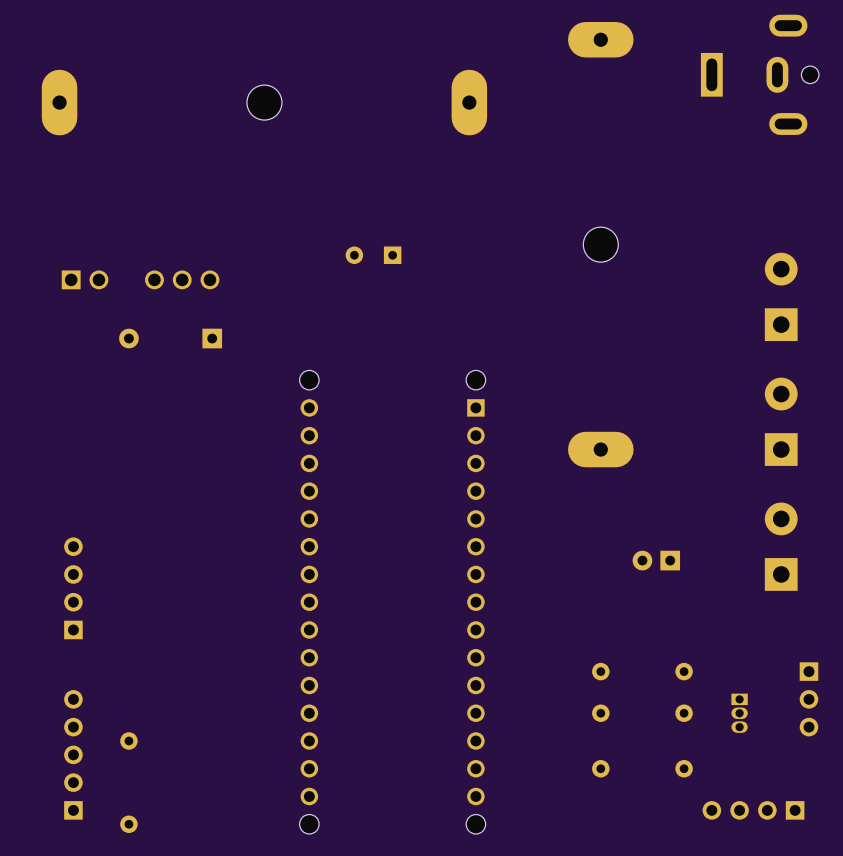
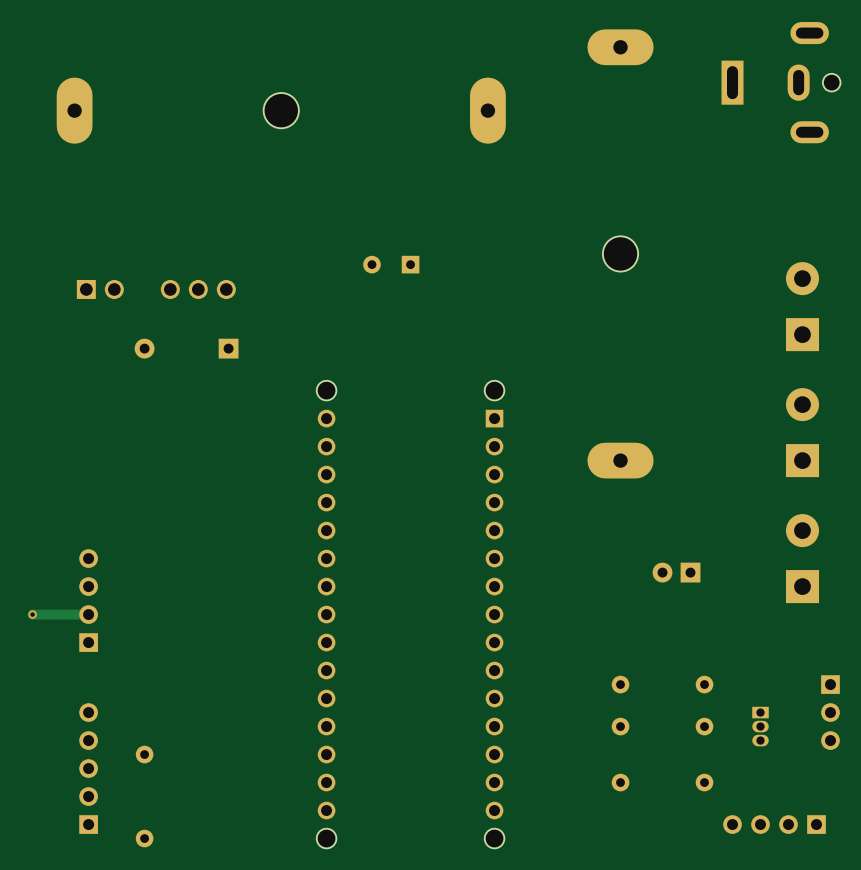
via: none -> (32, 614)
track: none -> (88, 614) (32, 614)

